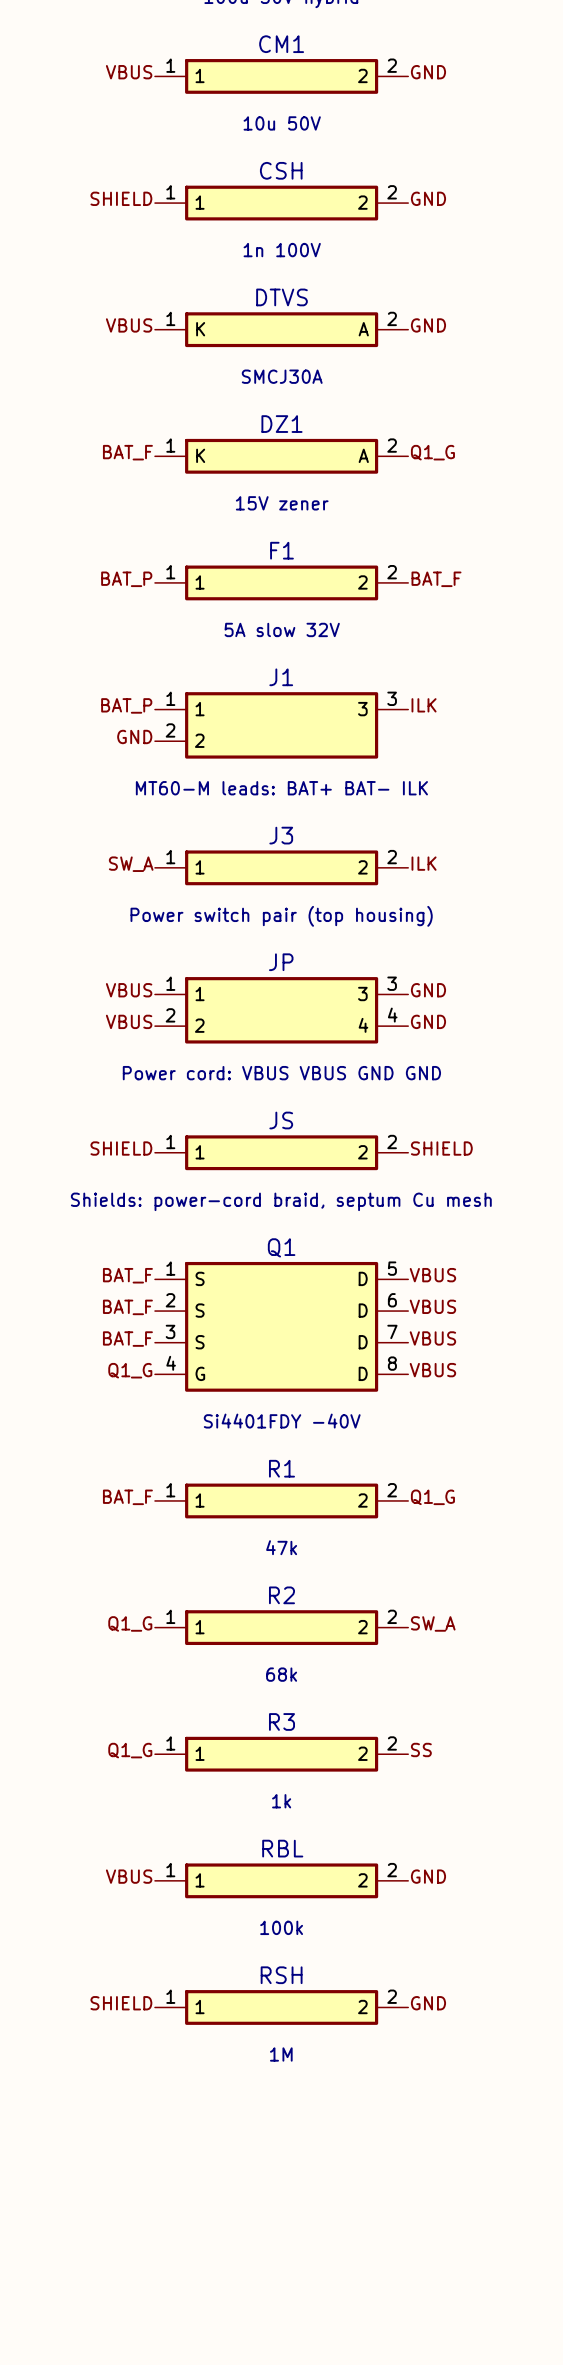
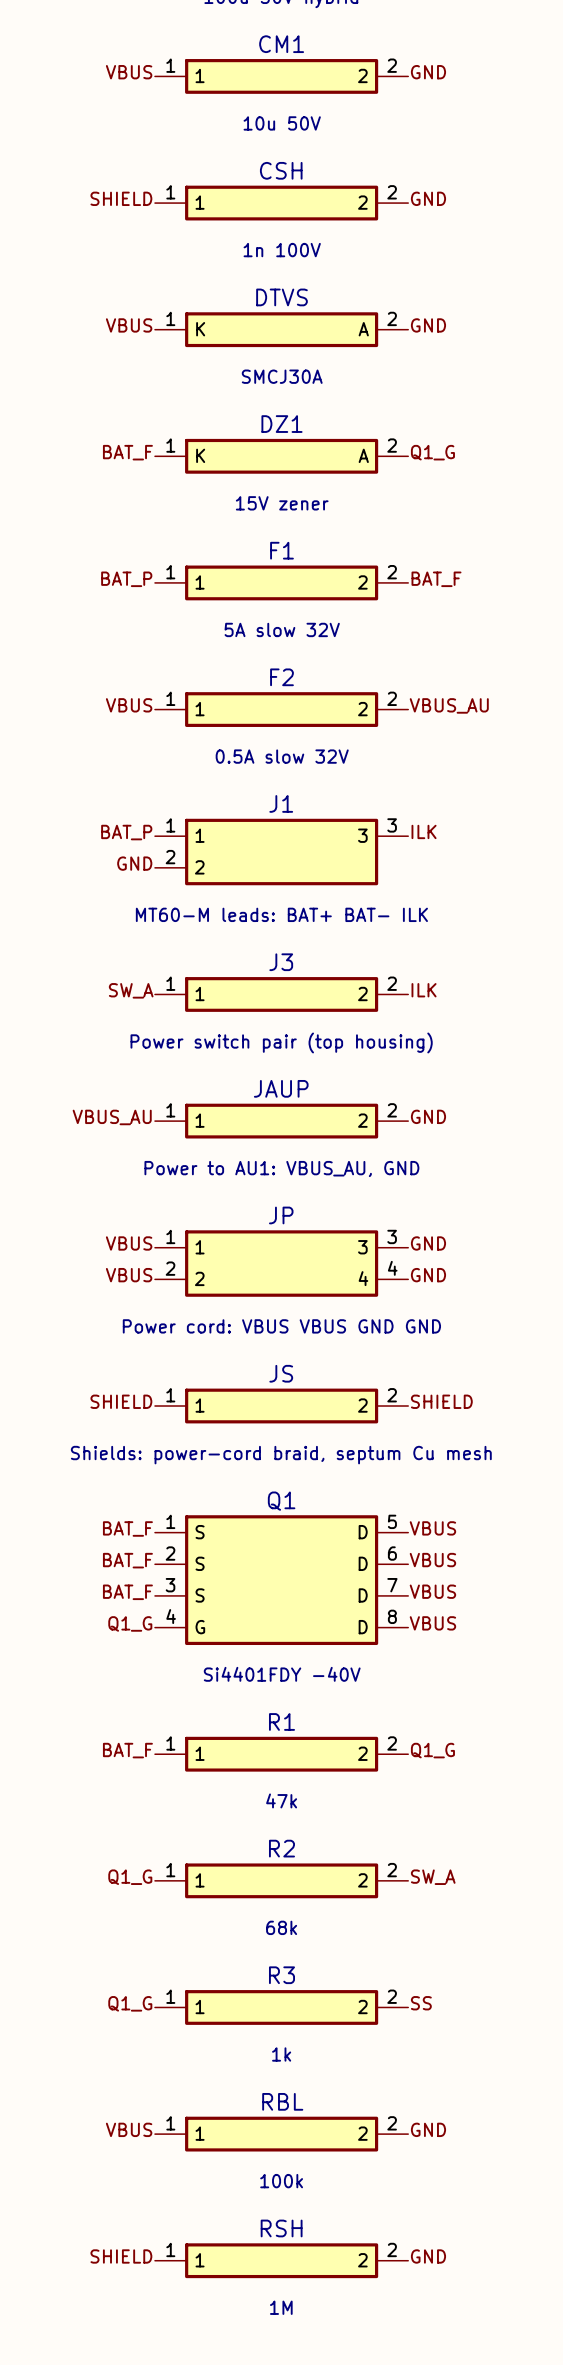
label: BAT_P (126, 705) -> VBUS (129, 705)
label: ILK (424, 705) -> VBUS_AU (449, 705)
F2: none -> 0.5A slow 32V (281, 709)
J1 position: (281, 725) -> (281, 852)
label: GND (134, 736) -> none
label: none -> BAT_P (126, 832)
label position: ILK (424, 863) -> ILK (424, 831)
label: SW_A (131, 864) -> GND (134, 863)
J3 position: (281, 867) -> (281, 994)
label: VBUS (129, 990) -> SW_A (131, 990)
label: GND (428, 990) -> ILK (424, 990)
JP position: (281, 1010) -> (281, 1263)
label: VBUS (129, 1021) -> none
label position: GND (428, 1021) -> GND (428, 1116)
label: none -> VBUS_AU (112, 1117)
JAUP: none -> Power to AU1: VBUS_AU, GND (281, 1121)
label: SHIELD (121, 1148) -> none
label: SHIELD (441, 1148) -> none
JS position: (281, 1152) -> (281, 1406)
label: none -> VBUS (129, 1243)
label: none -> GND (428, 1243)
label: BAT_F (127, 1275) -> VBUS (129, 1275)
label: VBUS (432, 1275) -> GND (428, 1275)
label: VBUS (432, 1306) -> none
label: BAT_F (127, 1307) -> none
Q1 position: (281, 1326) -> (281, 1580)
label: VBUS (432, 1338) -> none
label: BAT_F (127, 1339) -> none
label: Q1_G (130, 1370) -> none
label: VBUS (432, 1370) -> none
label: none -> SHIELD (121, 1401)
label: none -> SHIELD (441, 1401)
label: BAT_F (127, 1497) -> none
label: Q1_G (432, 1497) -> none
R1: 47k (281, 1500) -> none
label: none -> BAT_F (127, 1528)
label: none -> VBUS (432, 1528)
label: none -> BAT_F (127, 1560)
label: none -> VBUS (432, 1560)
label: none -> VBUS (432, 1591)
label: none -> BAT_F (127, 1592)
label: SW_A (433, 1623) -> VBUS (432, 1623)
R2: 68k (281, 1627) -> none
R3 name: R3 (281, 1721) -> R1 (281, 1721)
label: SS (421, 1749) -> Q1_G (432, 1750)
label: Q1_G (130, 1750) -> BAT_F (127, 1750)
R3 value: 1k (281, 1801) -> 47k (281, 1800)
RBL name: RBL (282, 1848) -> R2 (281, 1848)
label: VBUS (129, 1876) -> Q1_G (130, 1877)
label: GND (428, 1876) -> SW_A (433, 1877)
RBL value: 100k (281, 1927) -> 68k (281, 1927)
RSH name: RSH (281, 1975) -> R3 (281, 1975)
label: SHIELD (121, 2003) -> Q1_G (130, 2003)
label: GND (428, 2003) -> SS (421, 2003)
RSH value: 1M (281, 2054) -> 1k (281, 2054)
label: none -> VBUS (129, 2129)
label: none -> GND (428, 2129)
RBL: none -> 100k (281, 2134)
label: none -> SHIELD (121, 2256)
label: none -> GND (428, 2256)
RSH: none -> 1M (281, 2260)

